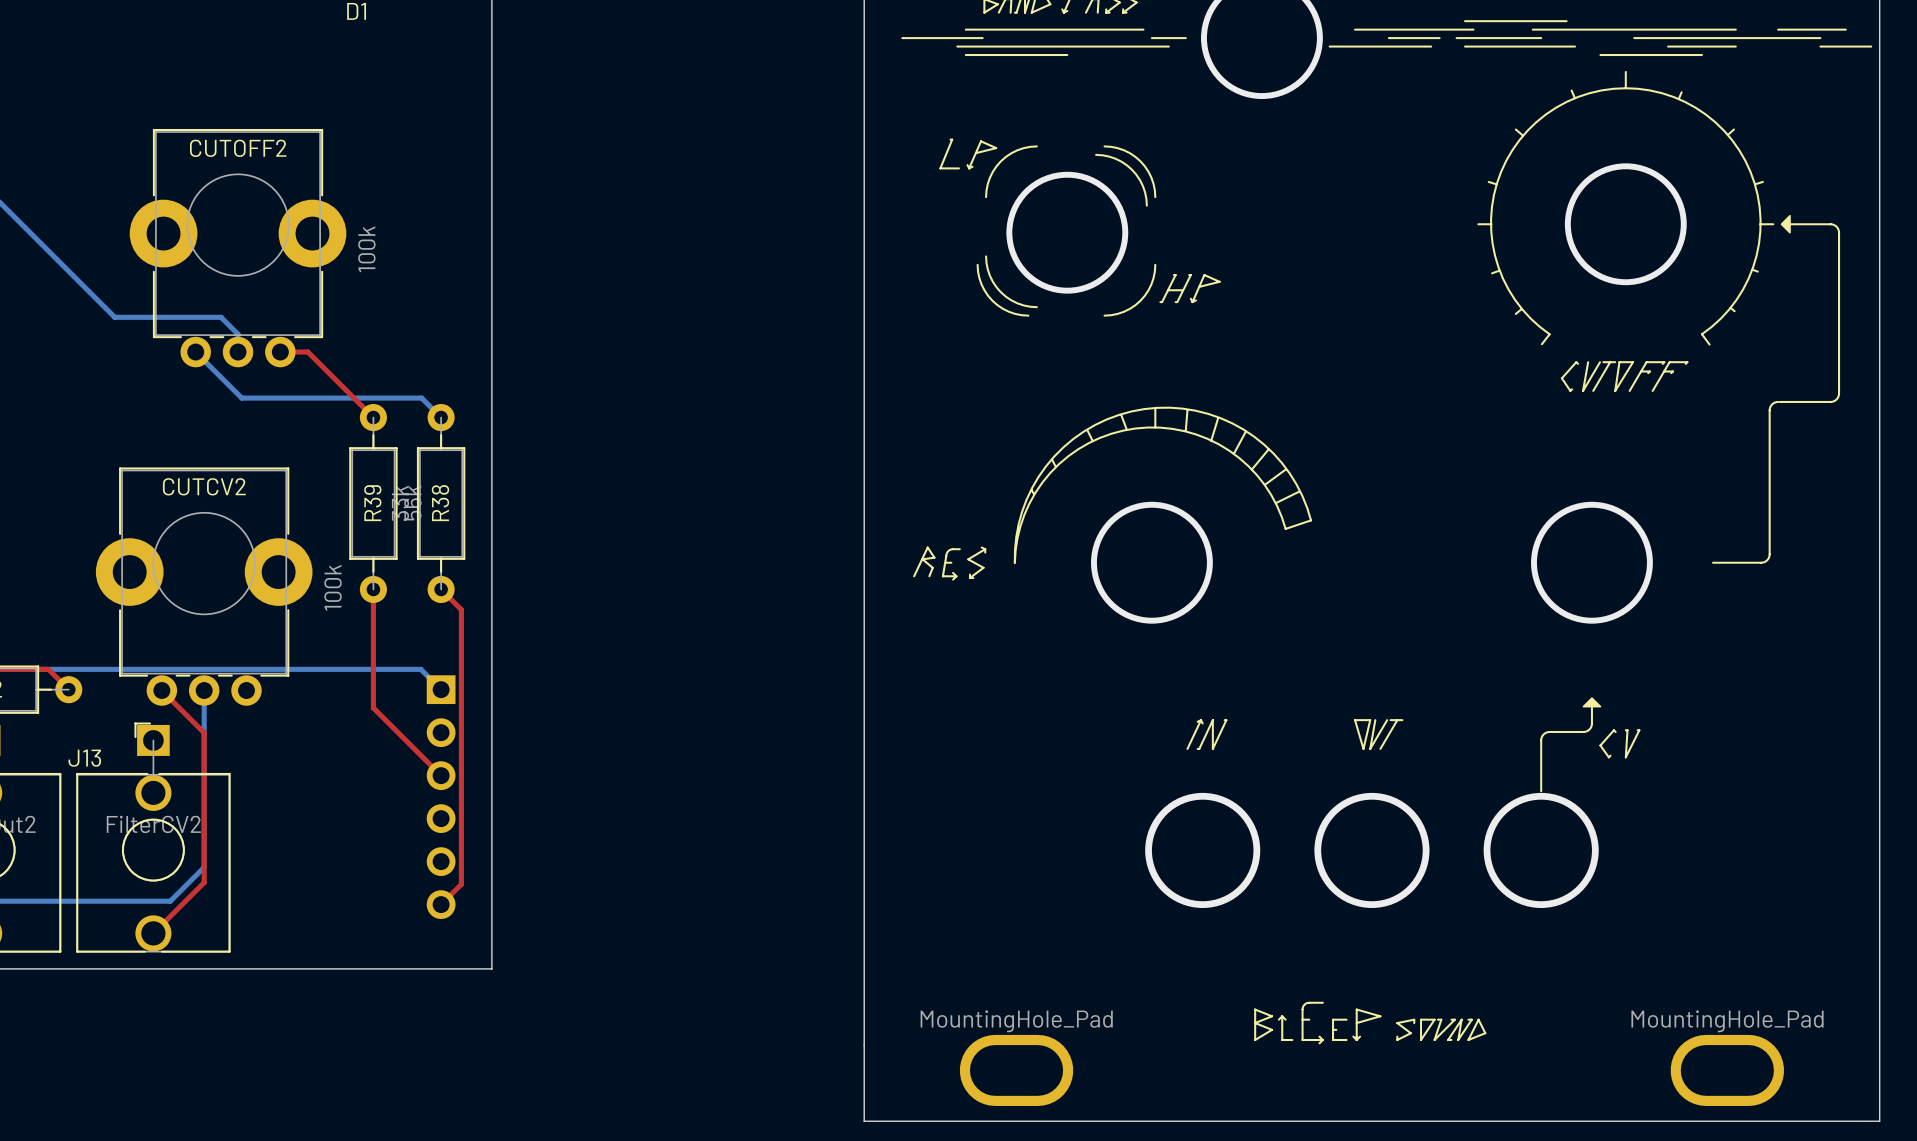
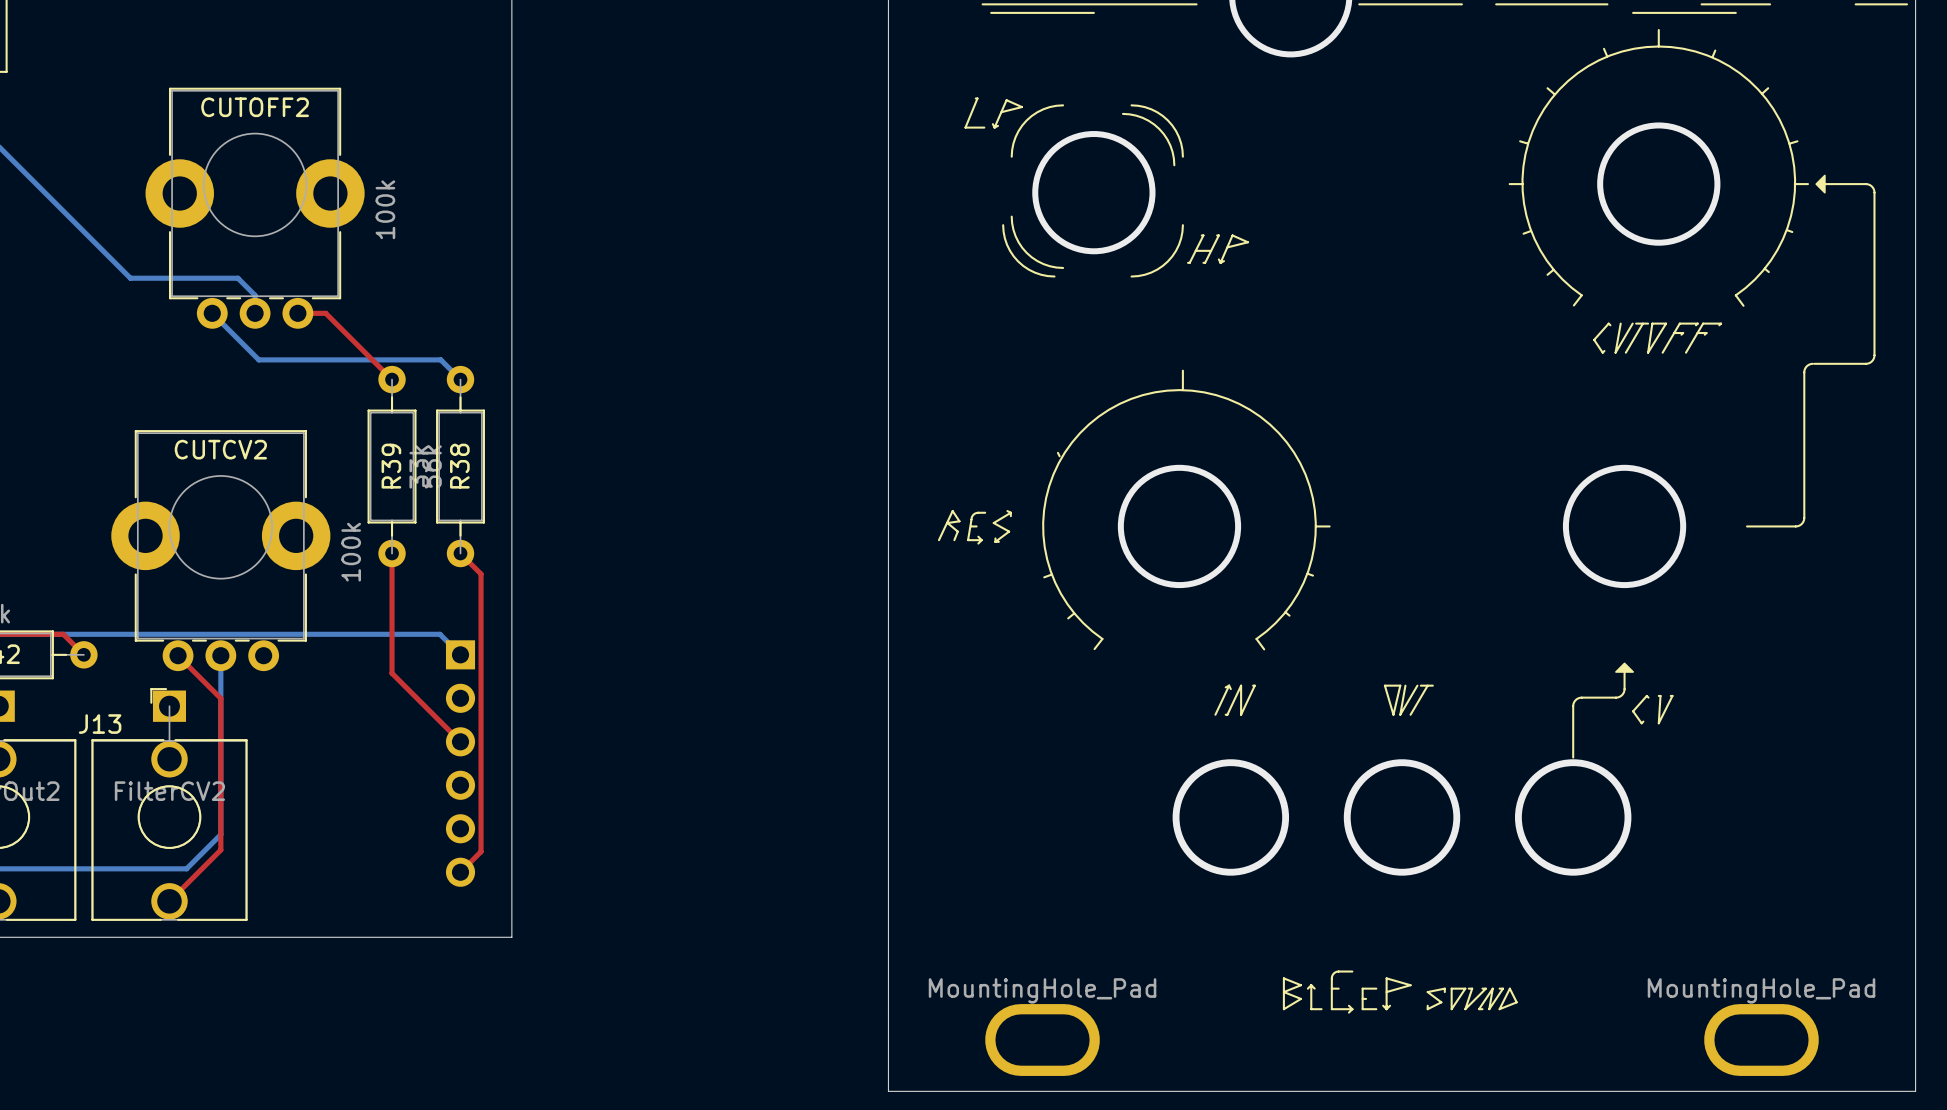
line: (1187, 410) (1185, 430) -> none
line: (1121, 415) (1126, 429) -> none
line: (1217, 418) (1211, 440) -> none
line: (1087, 430) (1092, 440) -> none
line: (1245, 431) (1234, 453) -> none
line: (1268, 449) (1251, 469) -> none
line: (1052, 459) (1055, 466) -> none
line: (1285, 469) (1264, 484) -> none
line: (1299, 491) (1276, 502) -> none
line: (1311, 520) (1285, 528) (1271, 495) (1256, 475) (1239, 458) (1218, 444) (1184, 431) (1160, 427) (1135, 428) (1111, 433) (1088, 443) (1068, 456) (1050, 473) (1035, 492) (1024, 514) (1017, 538) (1014, 562) (1016, 536) (1022, 511) (1032, 488) (1046, 466) (1063, 447) (1083, 431) (1106, 419) (1144, 409) (1169, 407) (1195, 410) (1220, 417) (1243, 429) (1264, 444) (1282, 463) (1296, 484) (1311, 520) -> none
line: none -> (1316, 526) (1329, 526)
line: none -> (1307, 573) (1313, 575)
line: none -> (1051, 574) (1044, 577)
line: none -> (1285, 612) (1289, 615)
line: none -> (1074, 613) (1068, 618)
line: none -> (1094, 649) (1102, 638) (1083, 623) (1067, 604) (1055, 582) (1047, 559) (1043, 522) (1049, 486) (1064, 452) (1080, 433) (1098, 416) (1131, 398) (1154, 392) (1179, 390) (1216, 395) (1239, 403) (1260, 416) (1286, 442) (1300, 463) (1309, 486) (1315, 522) (1311, 559) (1303, 582) (1291, 604) (1275, 623) (1256, 638) (1264, 649)

